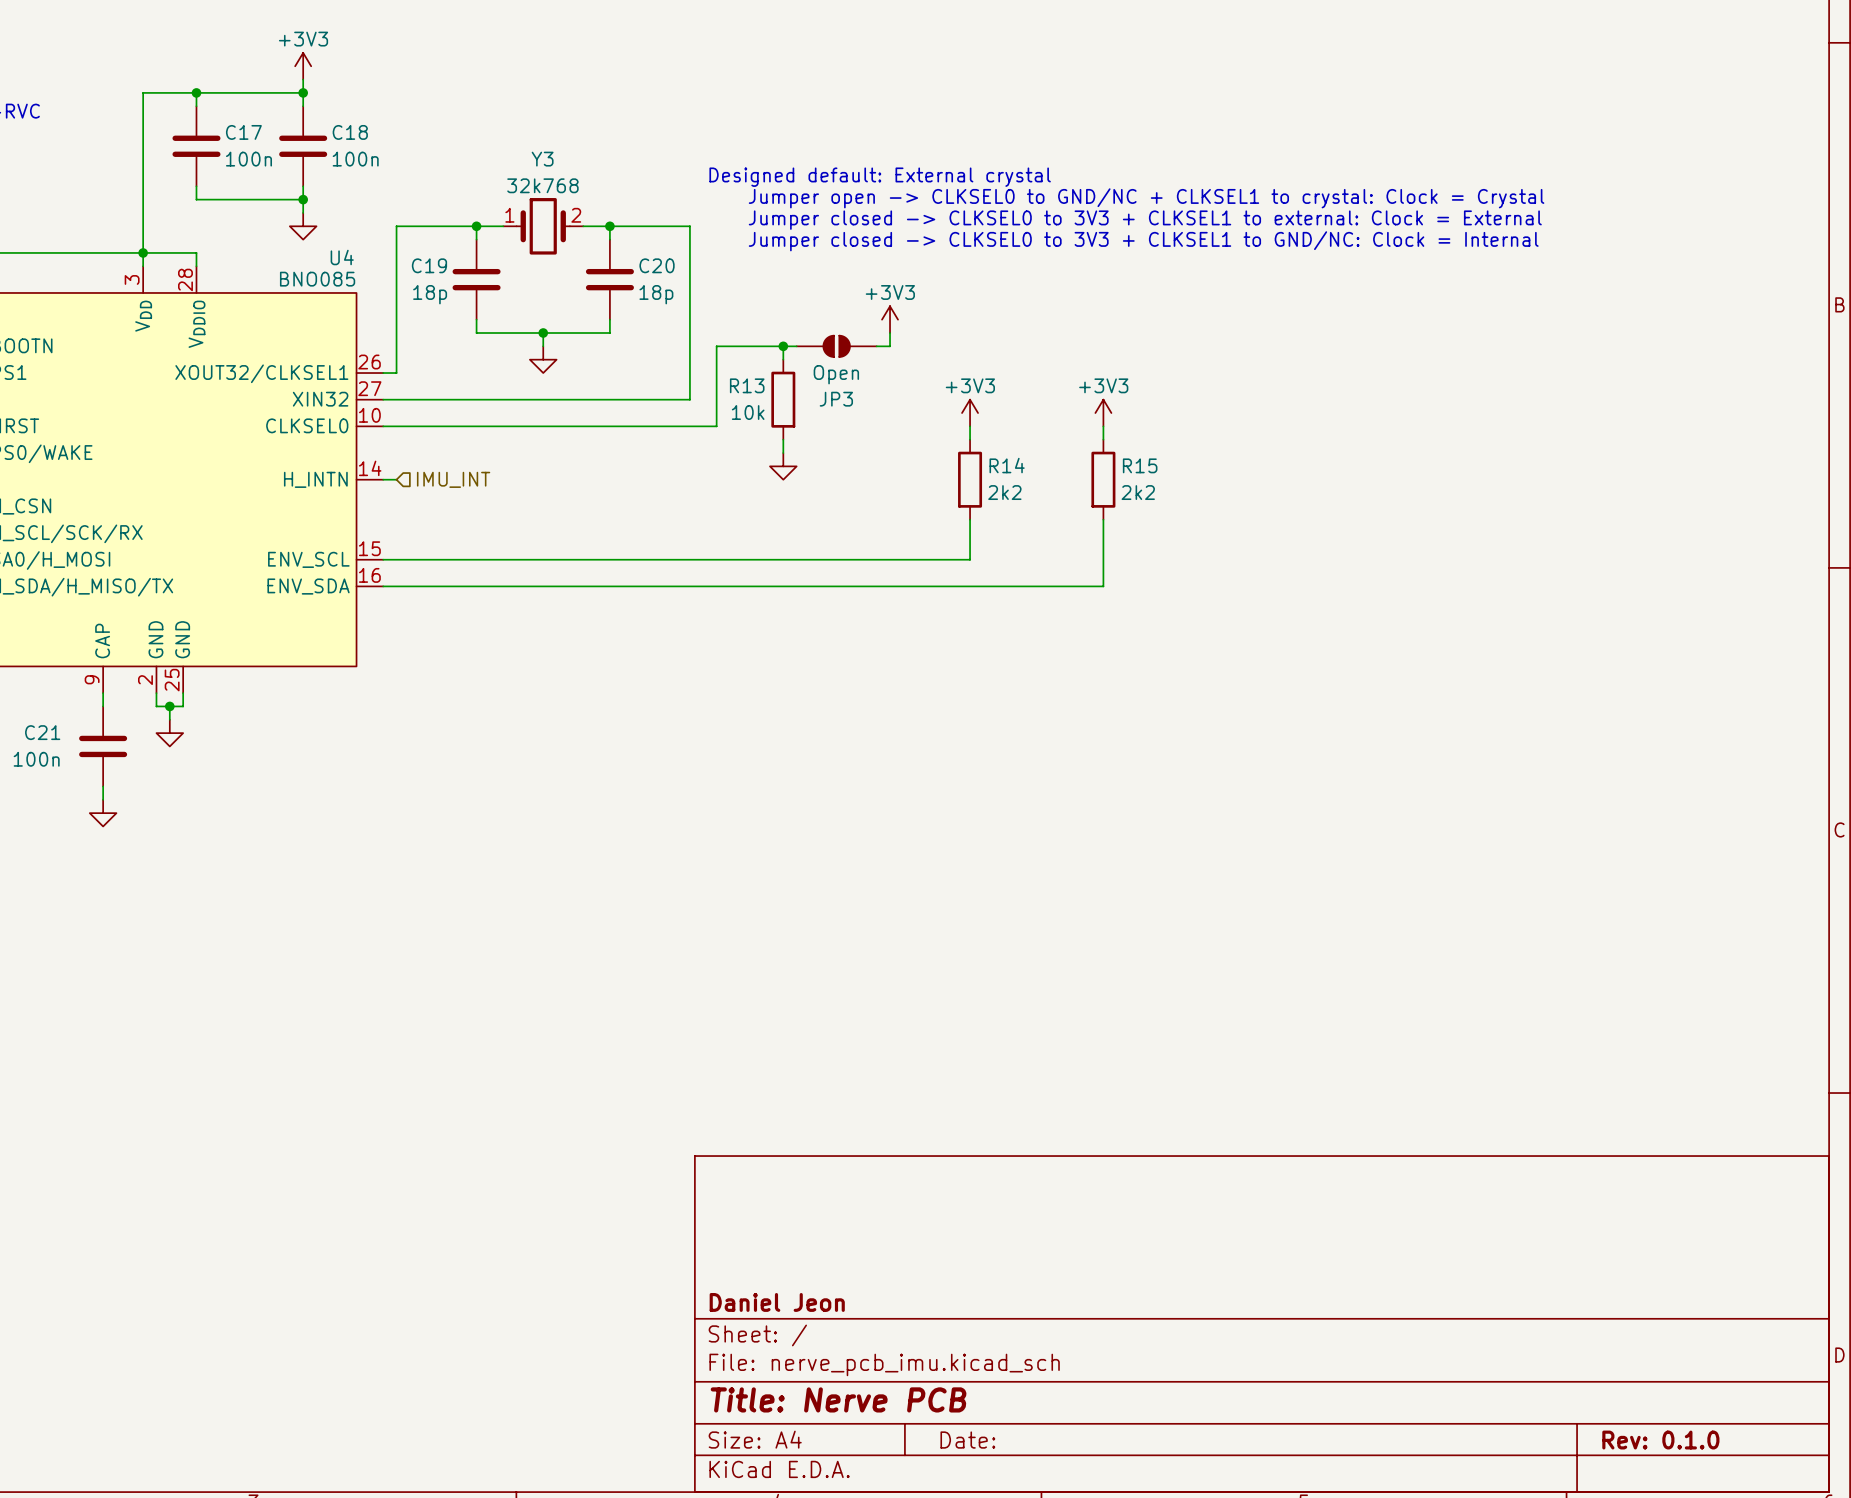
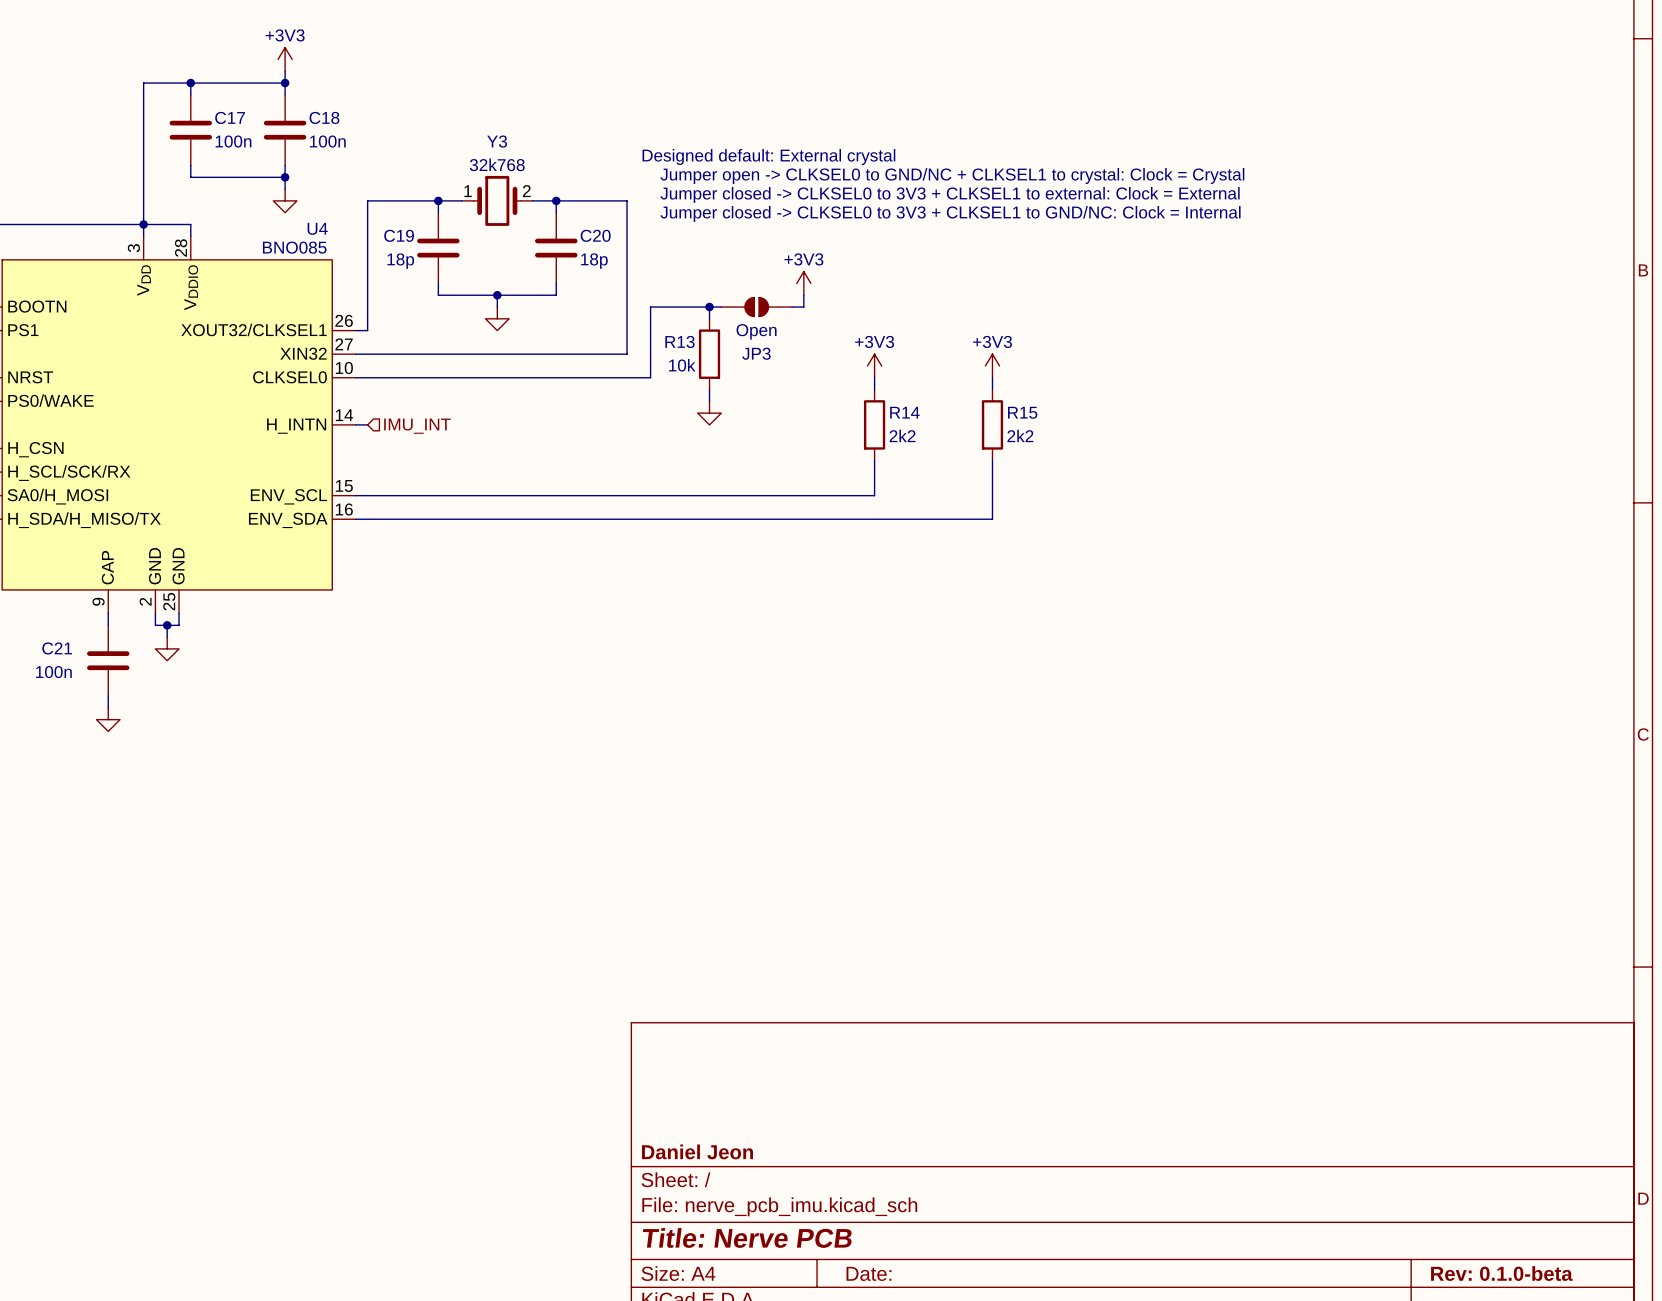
title block: Rev: 0.1.0 (1660, 1440) -> Rev: 0.1.0-beta (1501, 1273)

